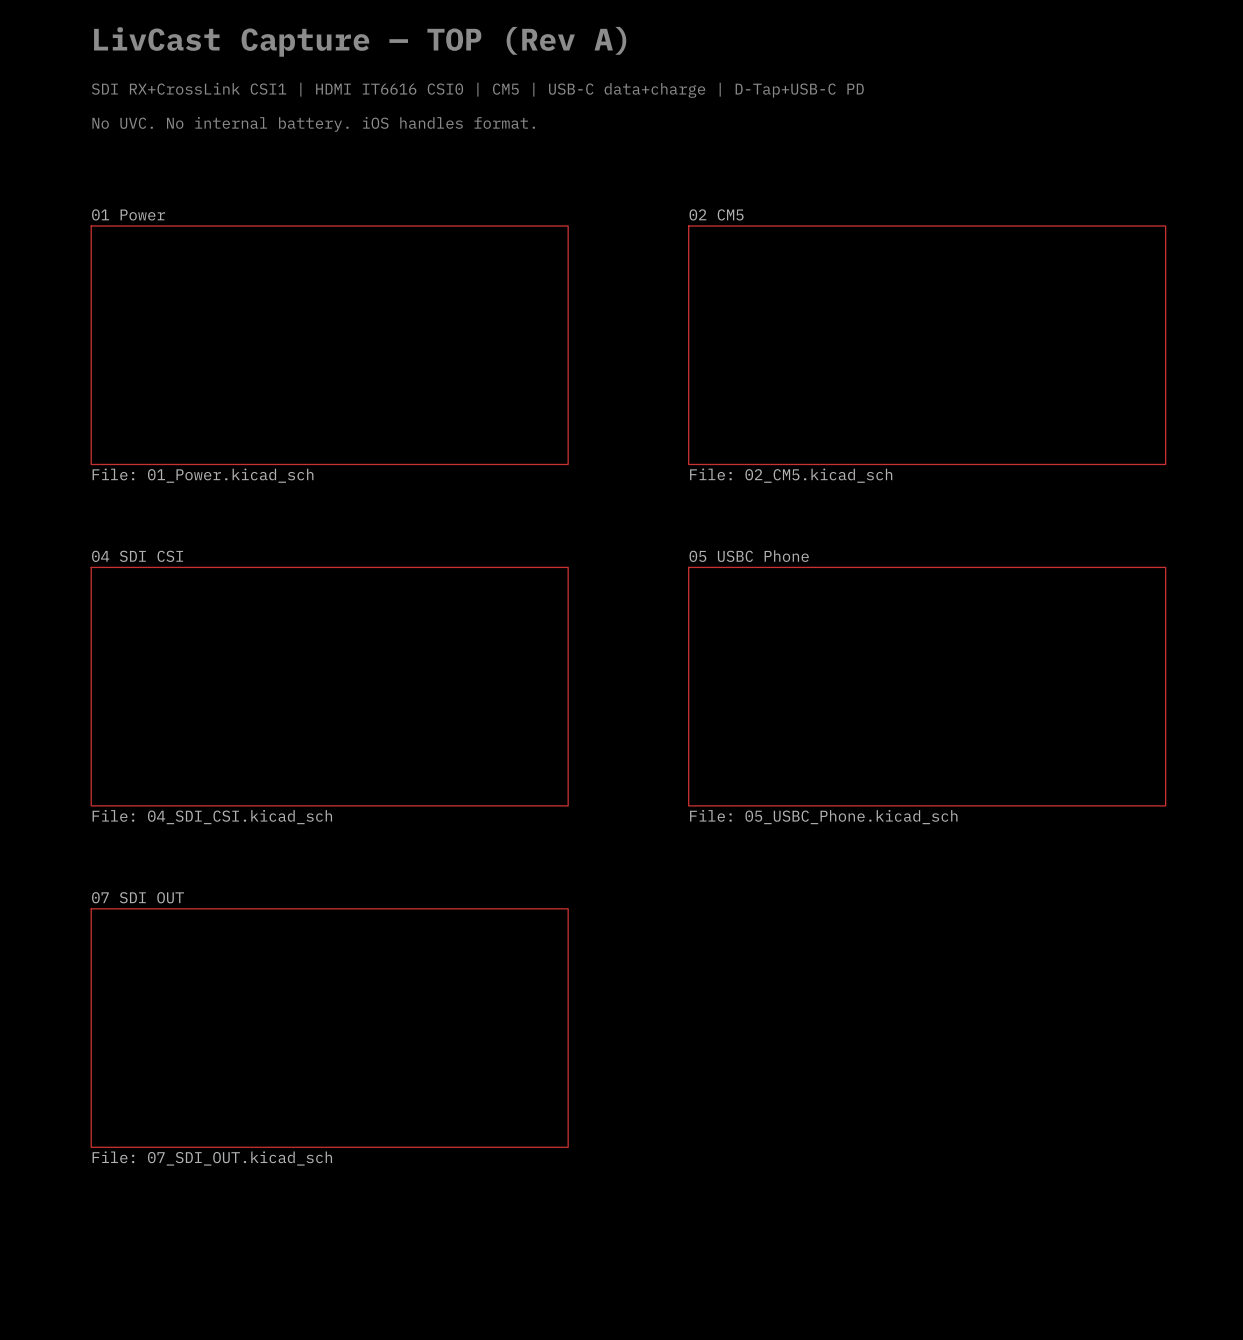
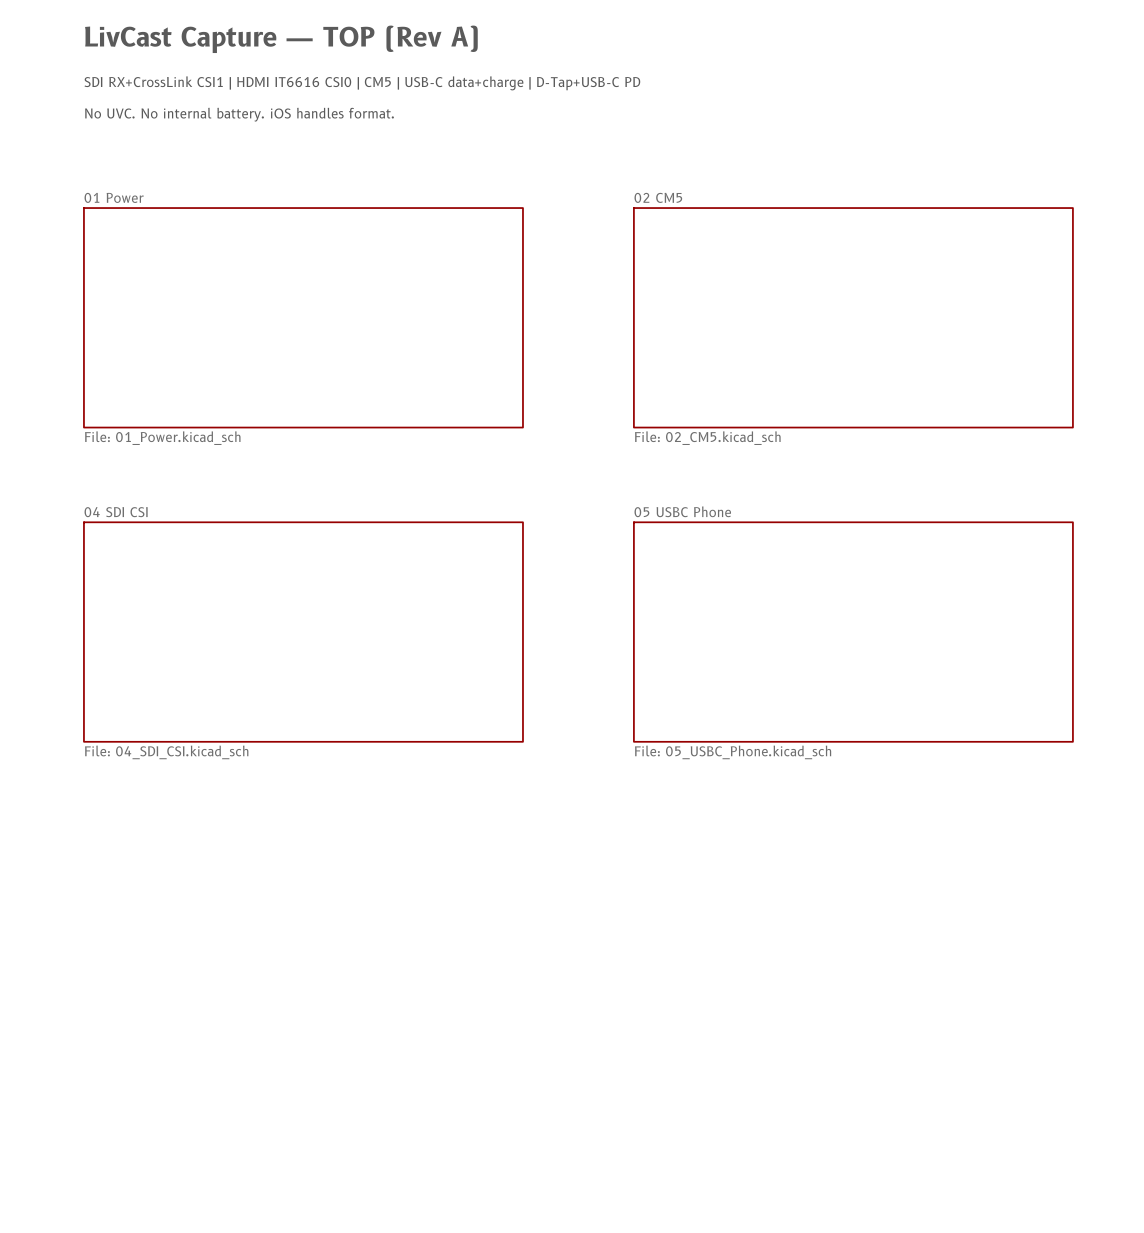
sheet 07 SDI OUT: File: 07_SDI_OUT.kicad_sch (329, 1028) -> none

